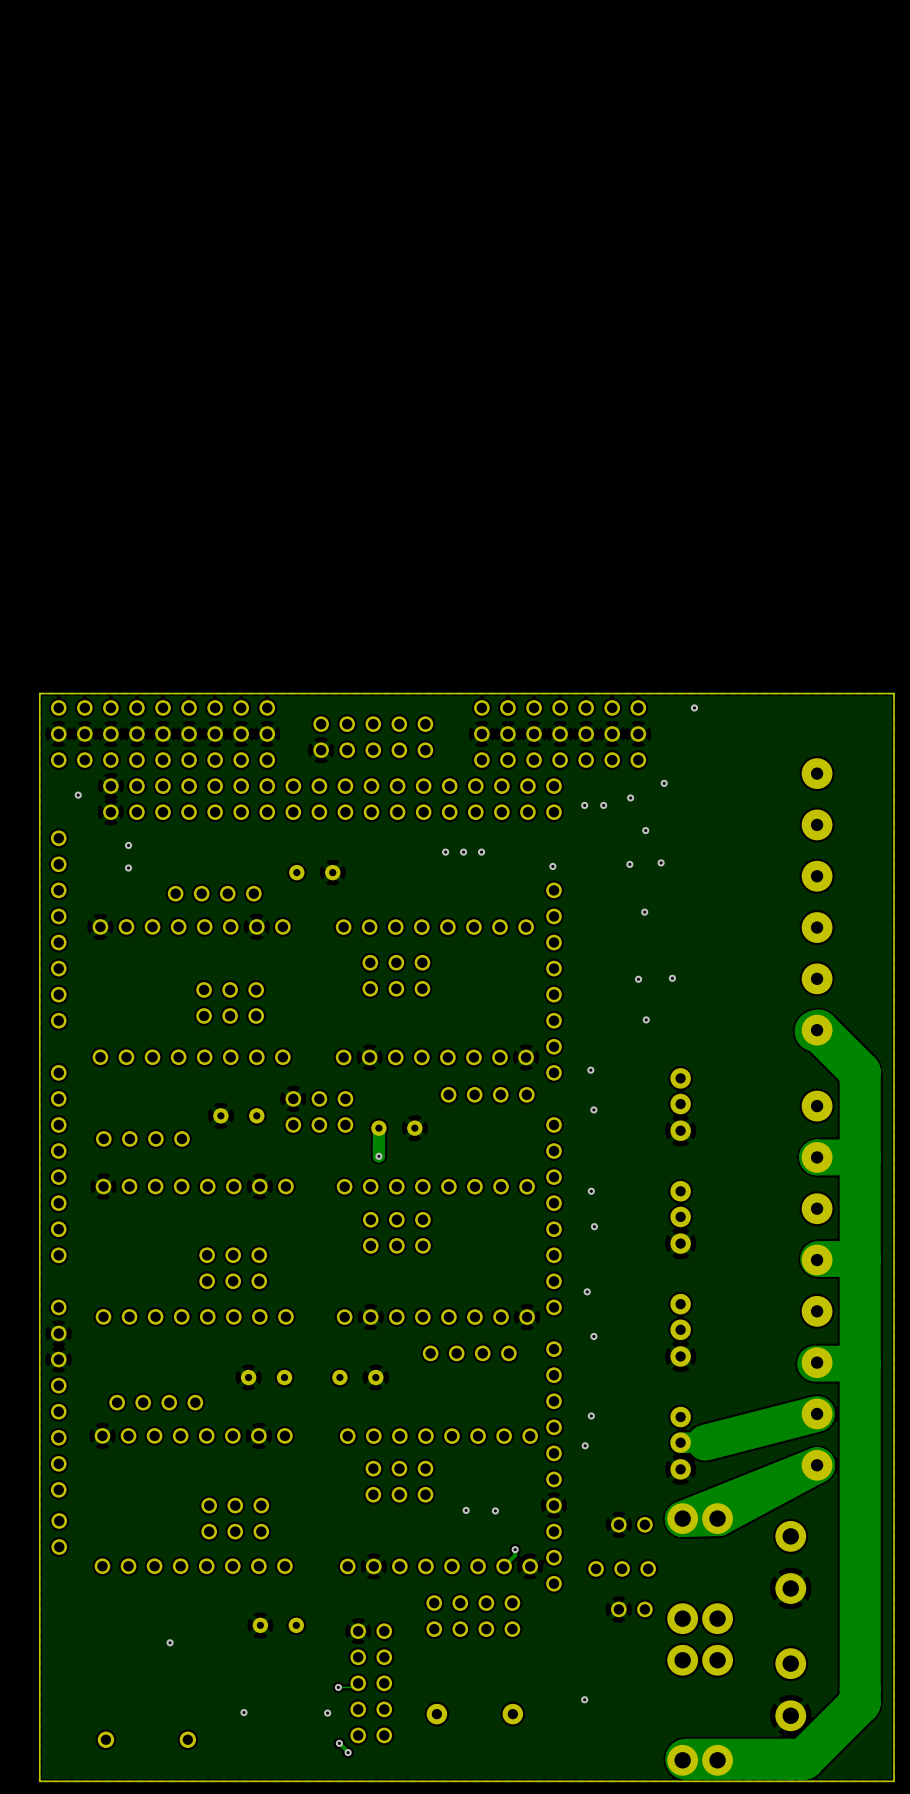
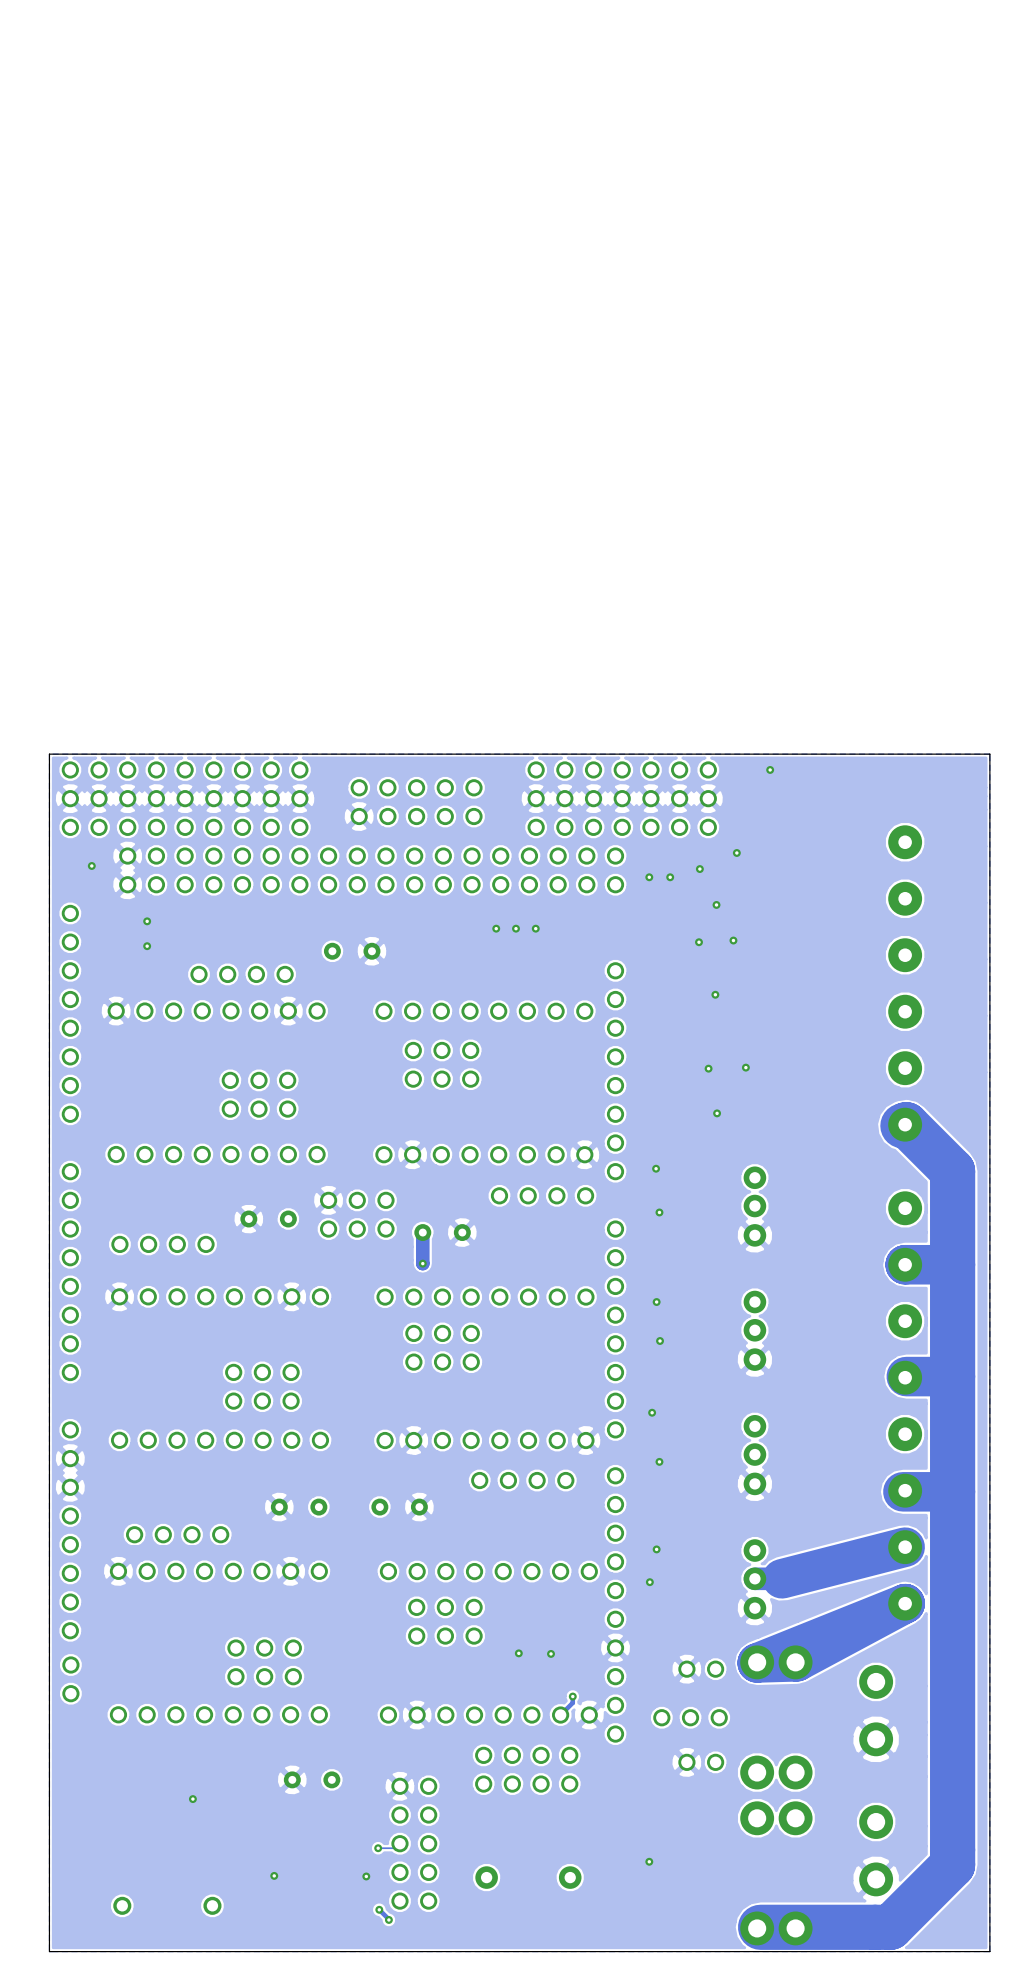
via: (552, 866) -> none

